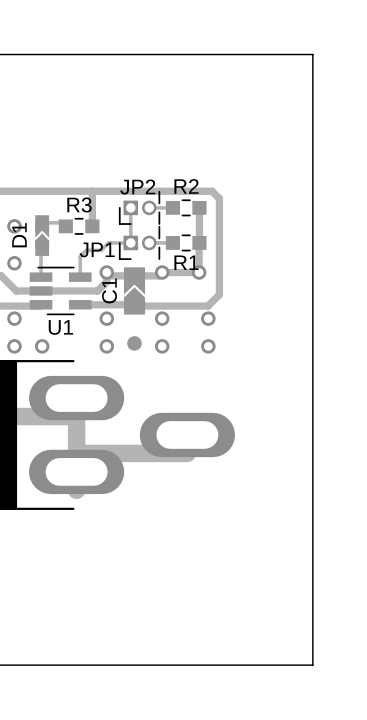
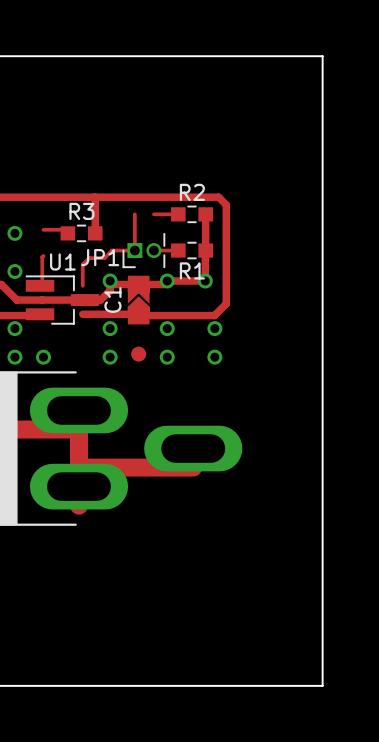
JP2: (139, 207) -> none
D1: (42, 235) -> none
U1 footprint: [29, 266, 92, 316] -> [25, 275, 100, 325]
U1 name position: U1 (60, 327) -> U1 (62, 262)

